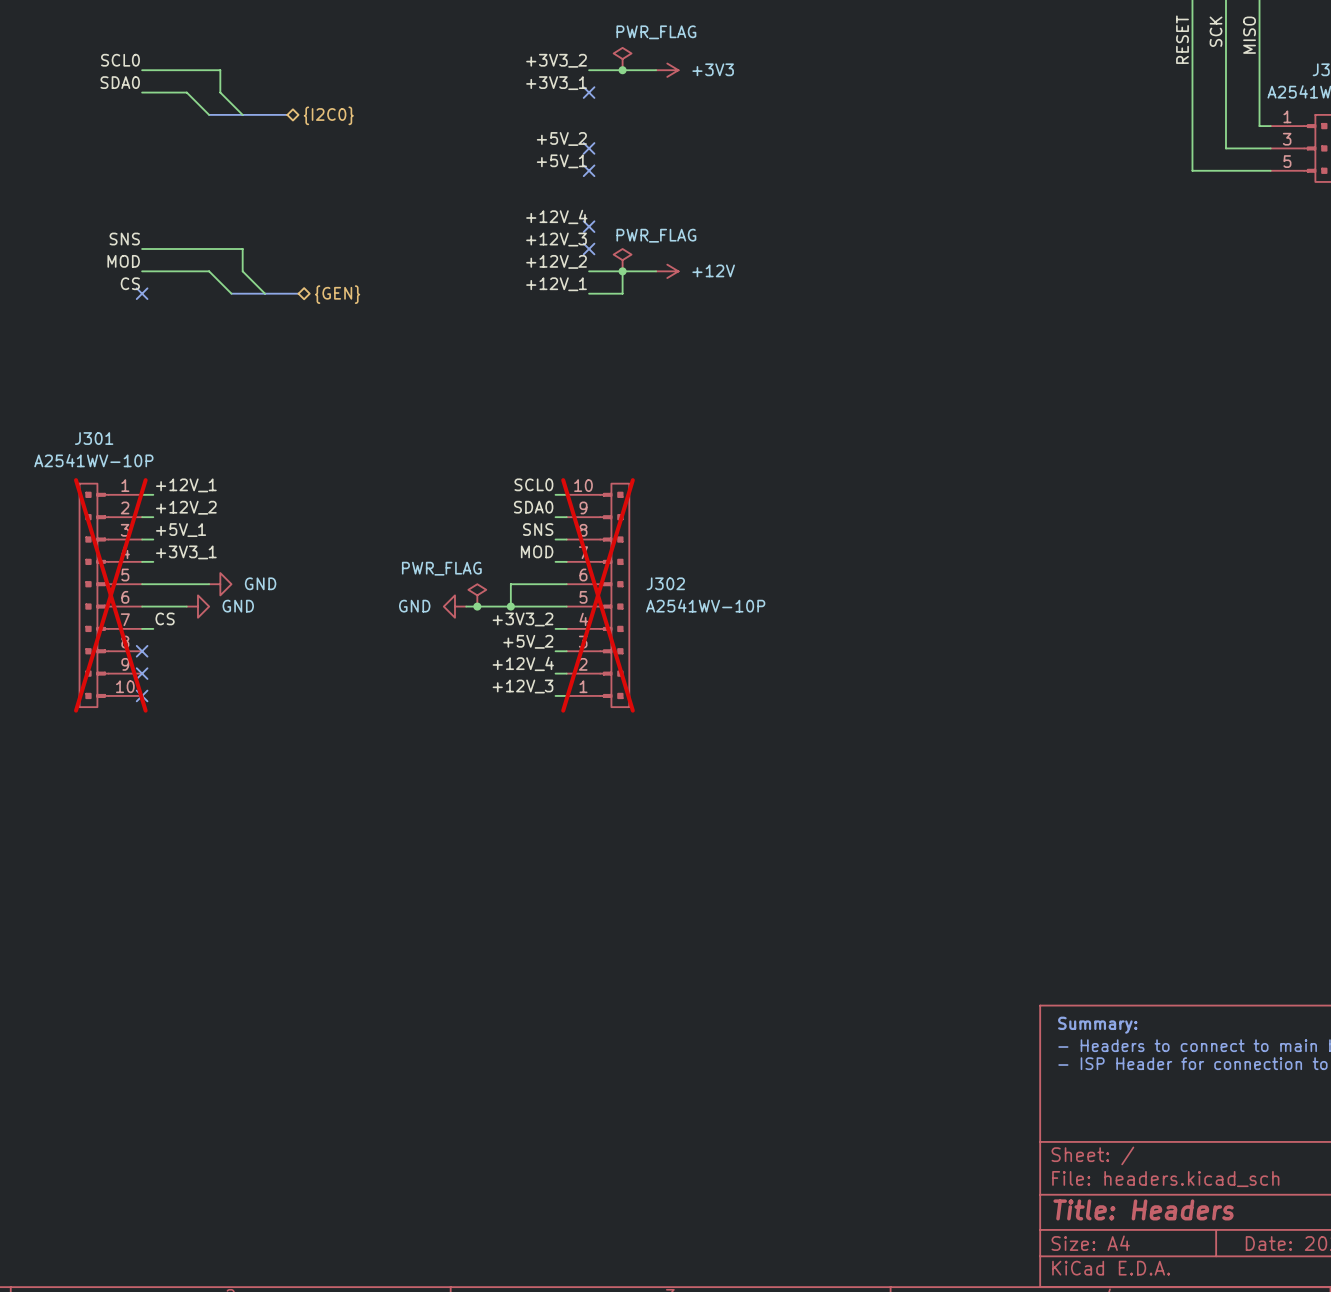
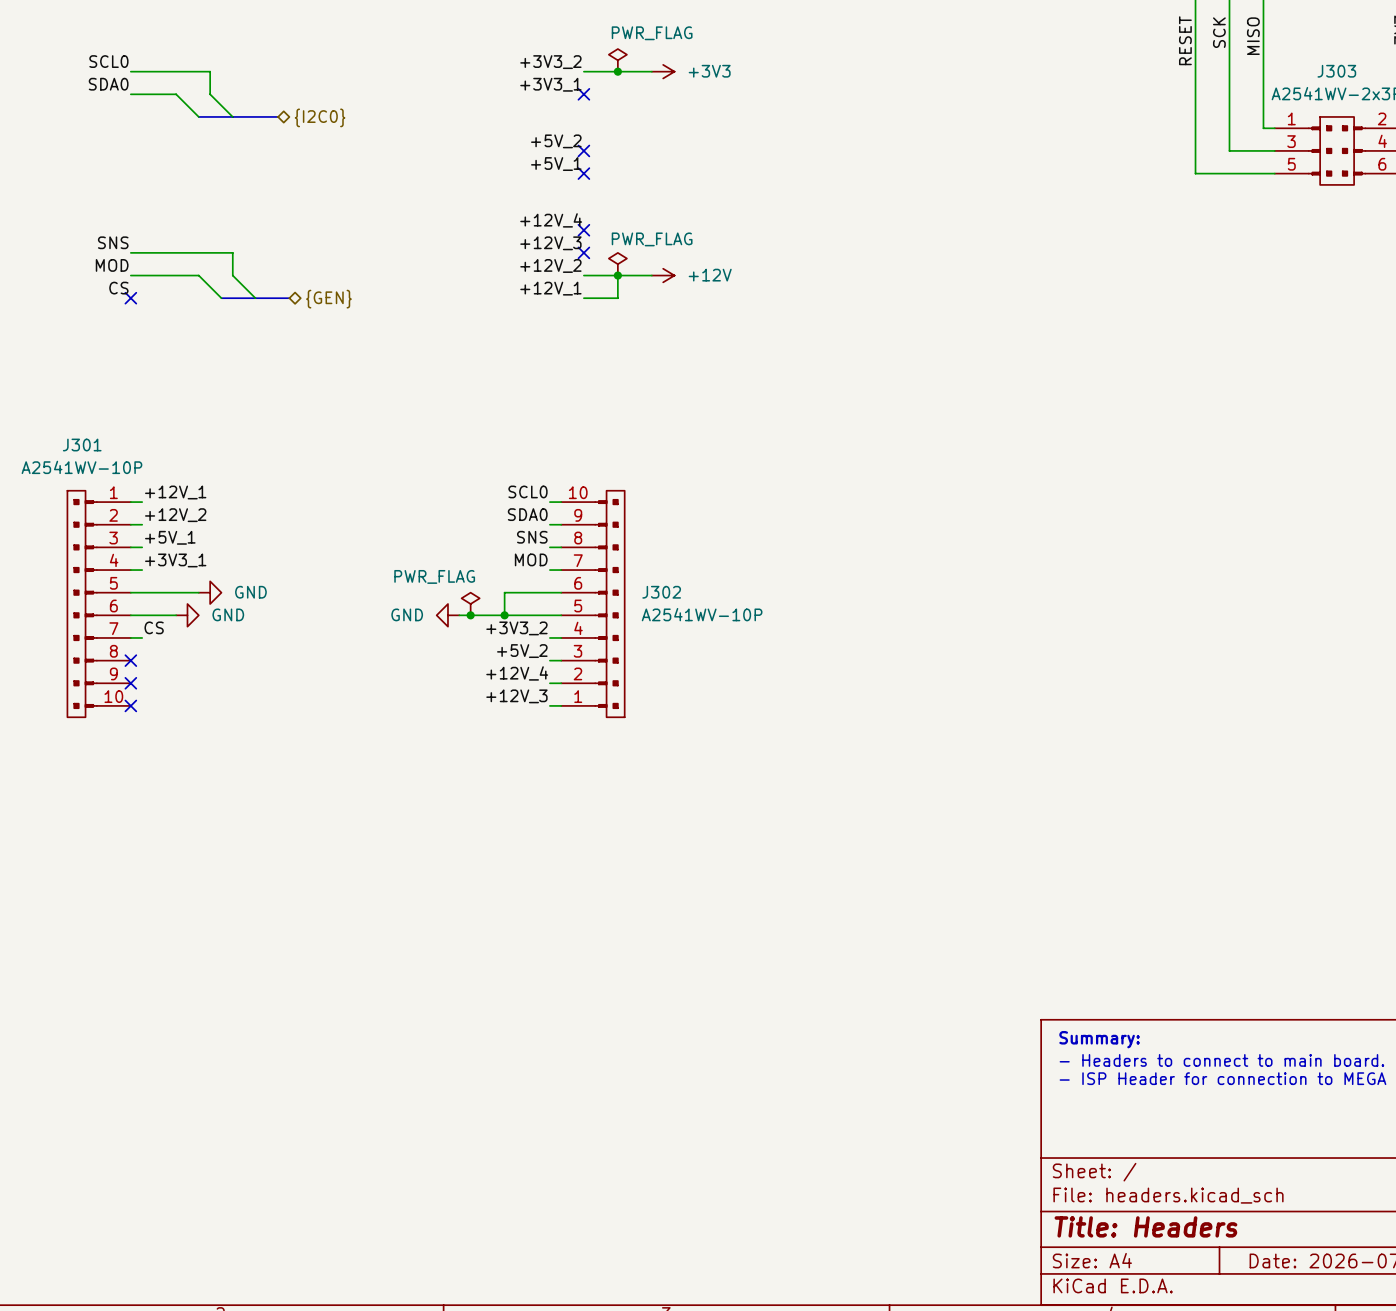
J301 do-not-place cross: (110, 595) -> none
J302 do-not-place cross: (598, 595) -> none

